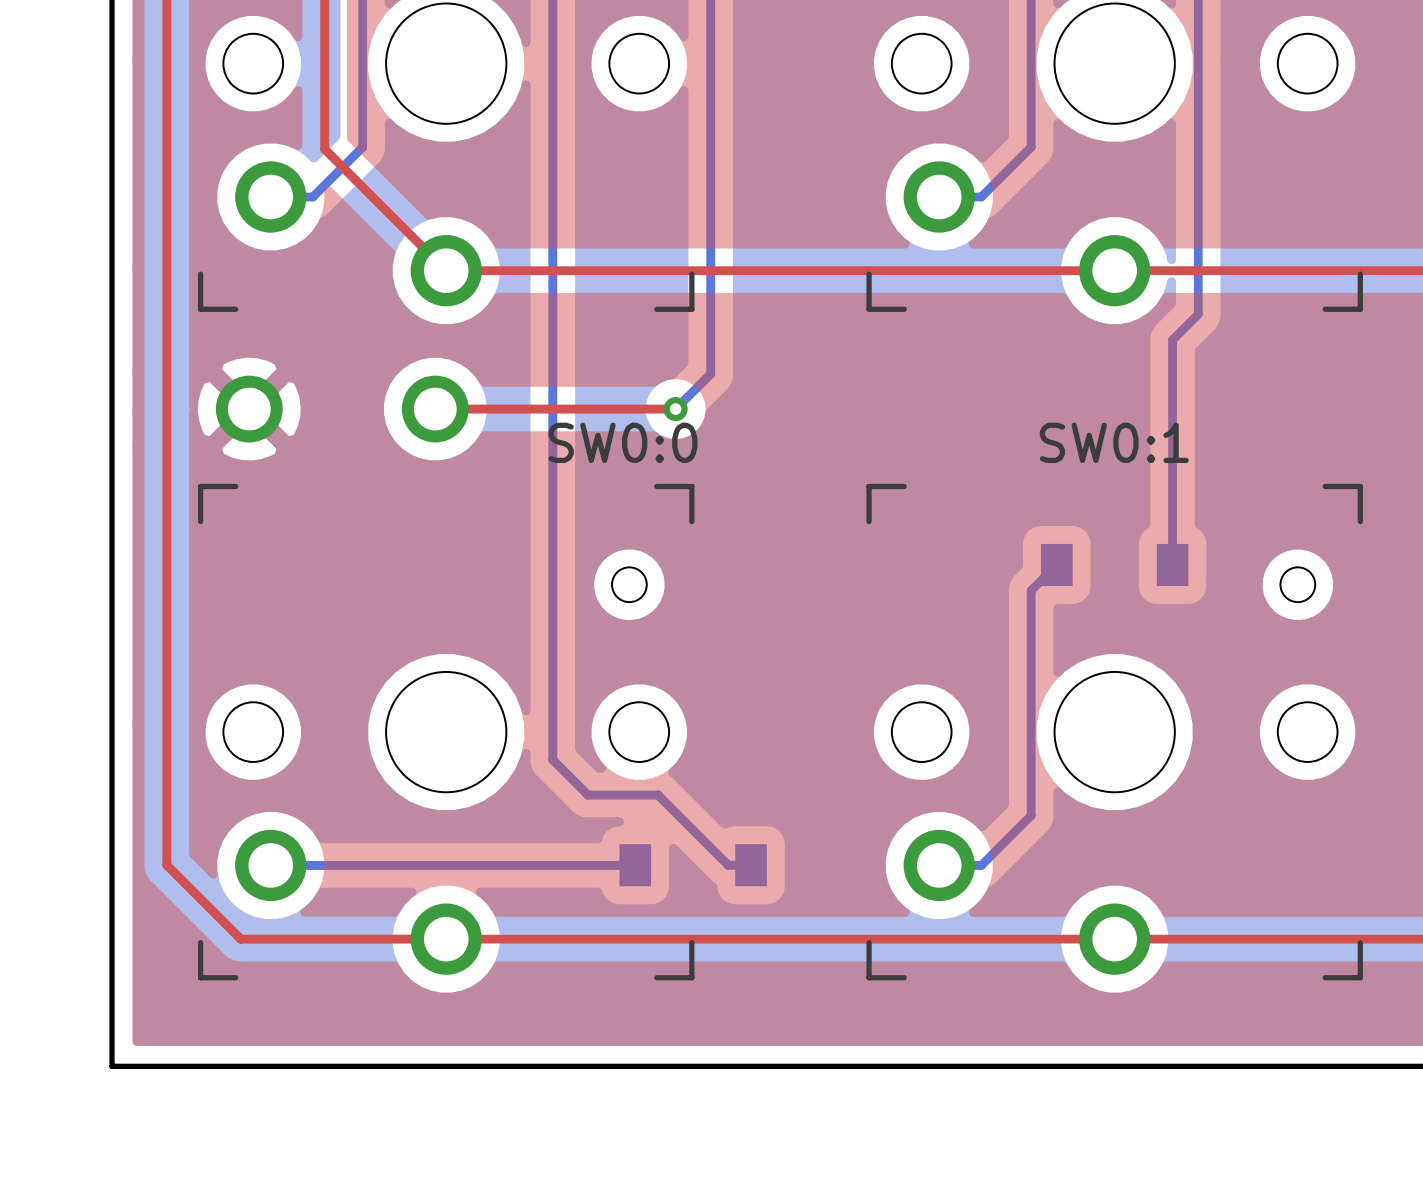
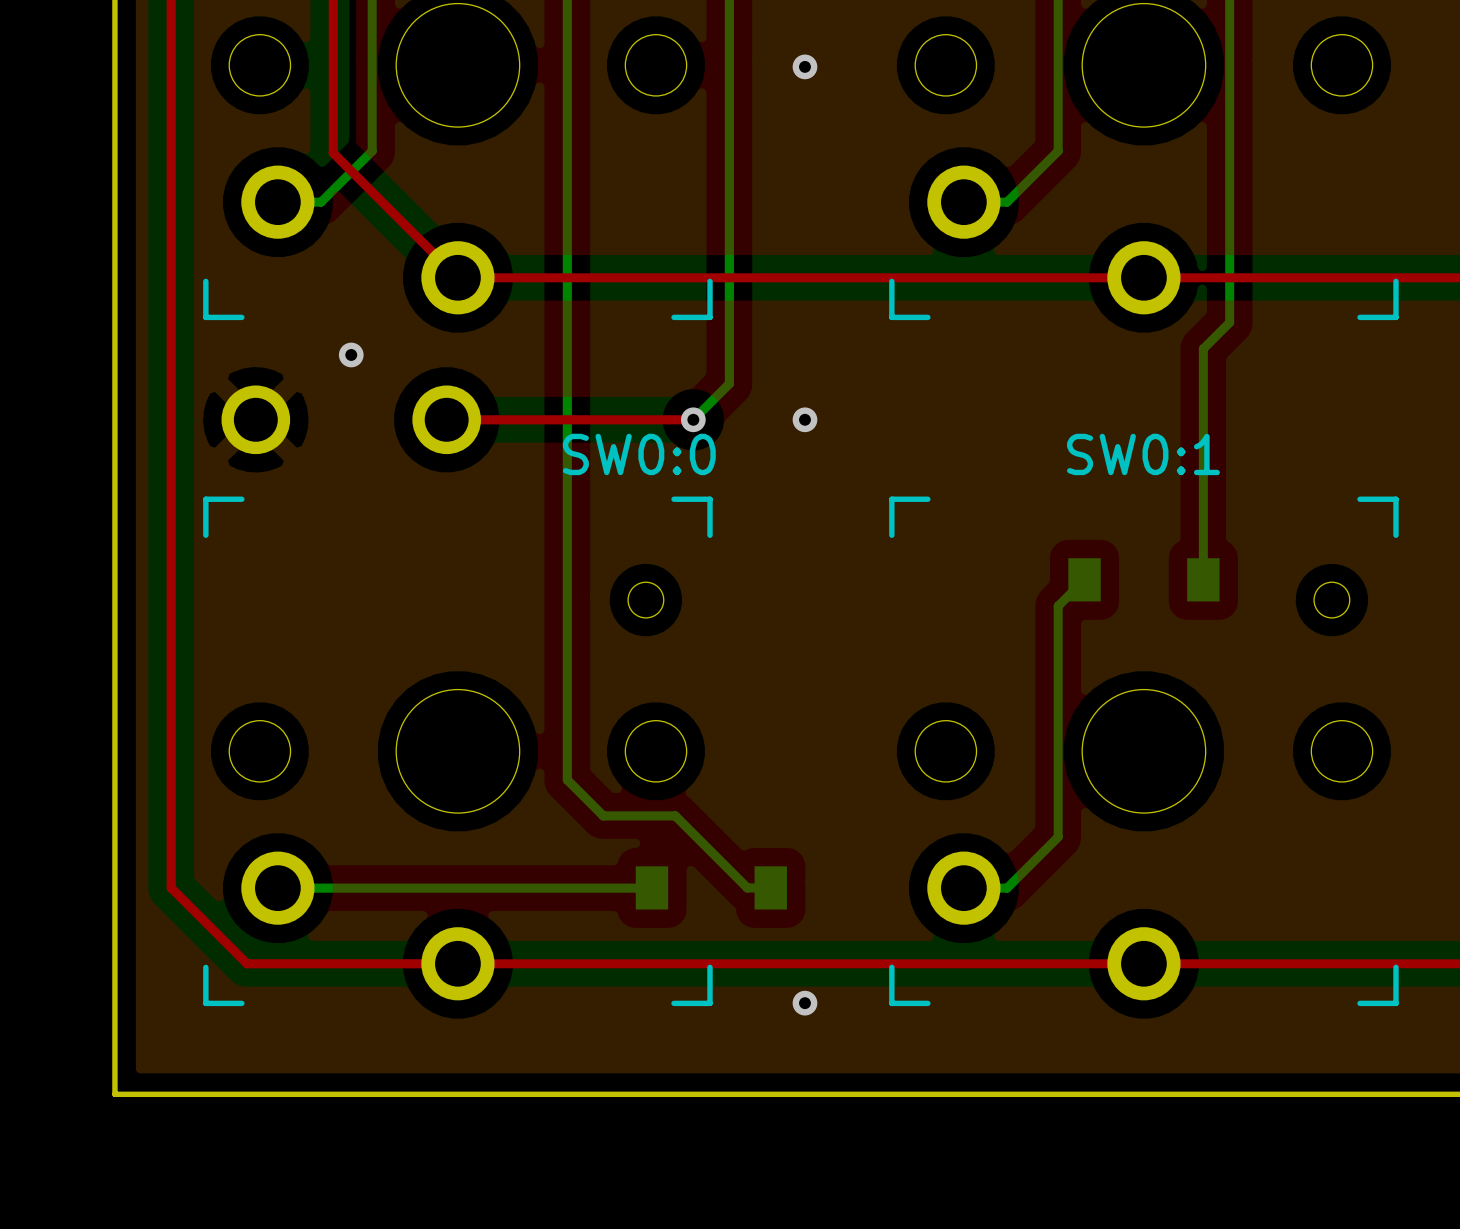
via: none -> (804, 66)
via: none -> (351, 354)
via: none -> (804, 419)
via: none -> (804, 1003)

